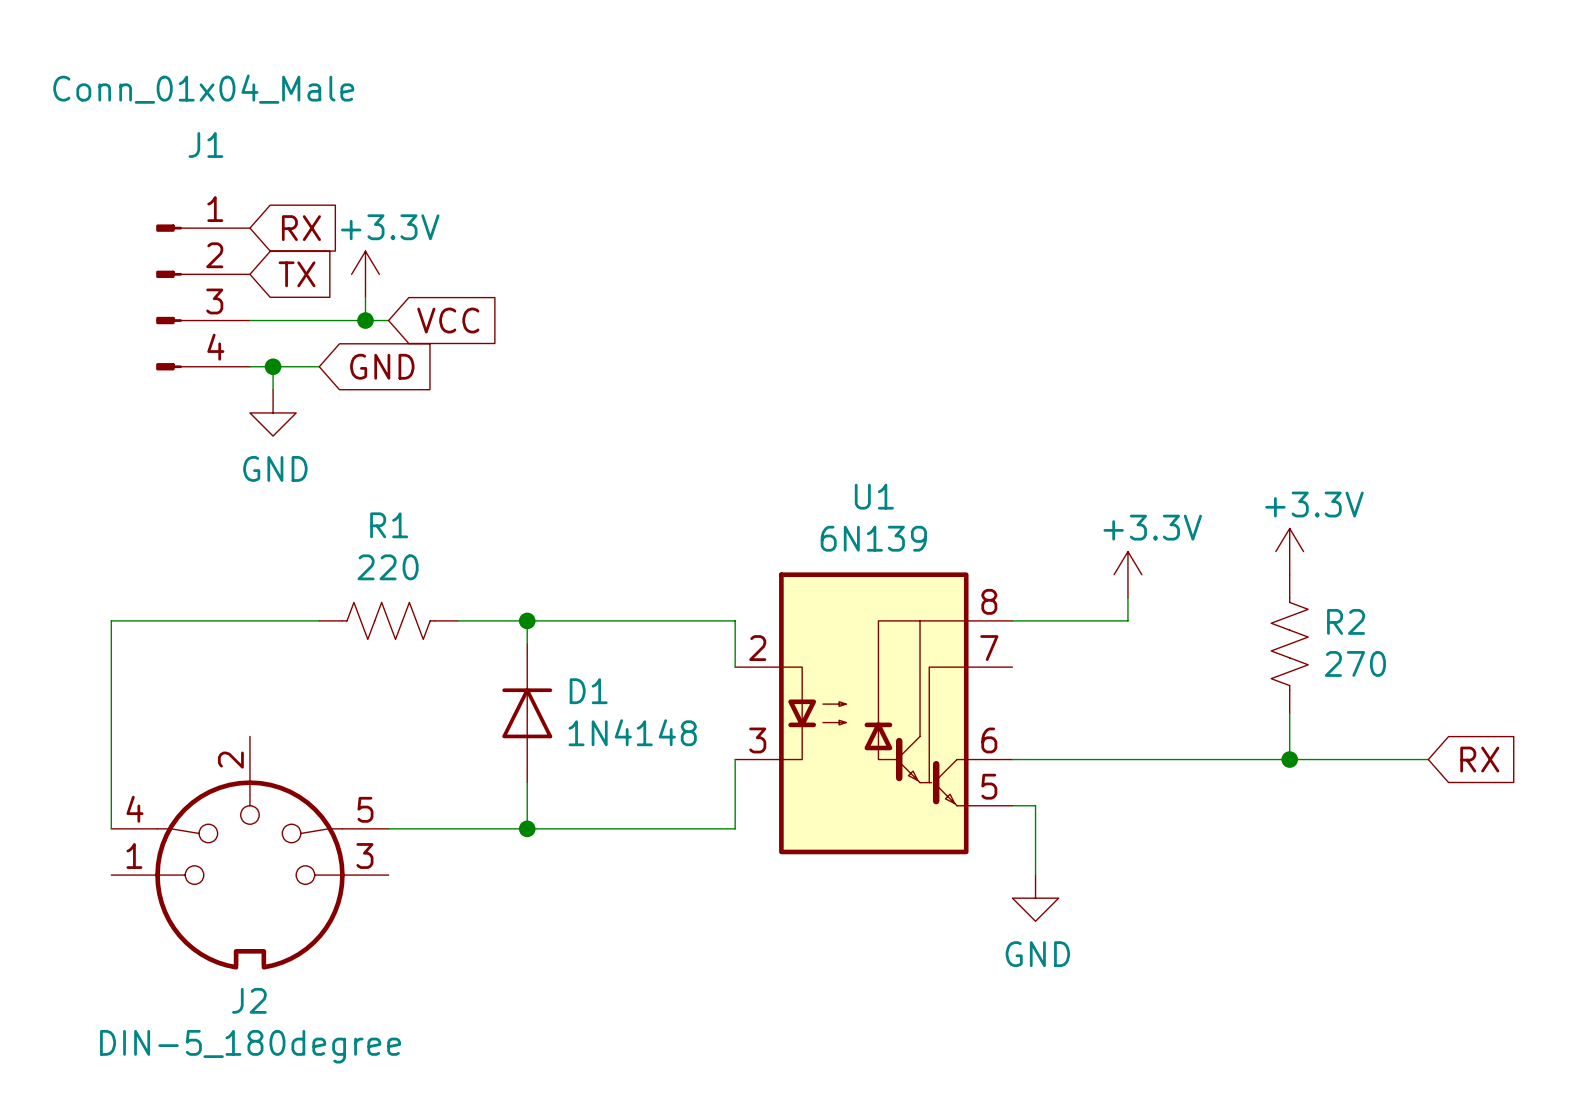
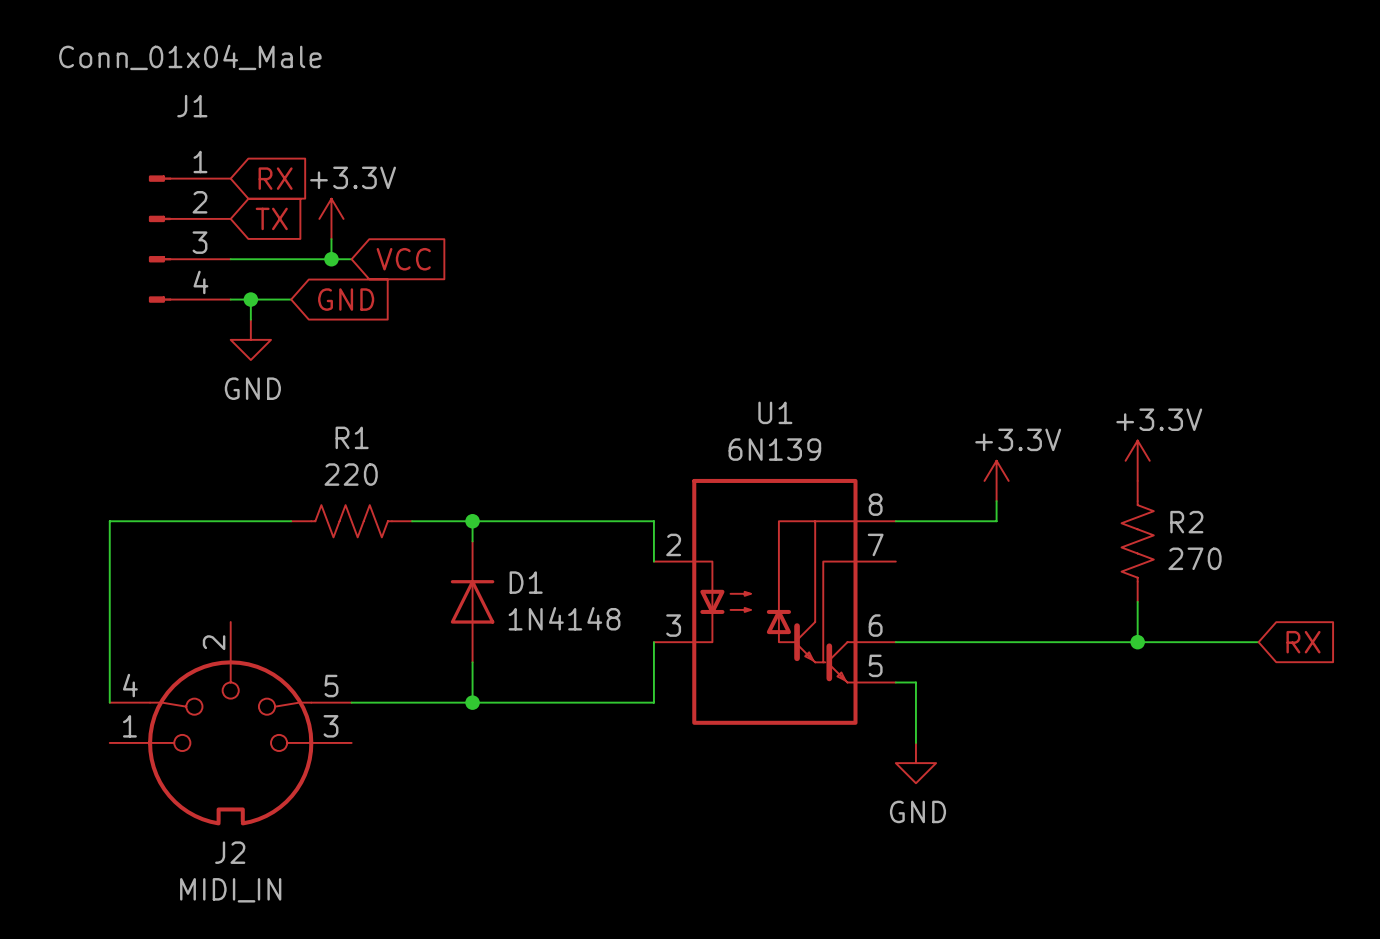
J2 value: DIN-5_180degree (250, 1046) -> MIDI_IN (230, 890)

